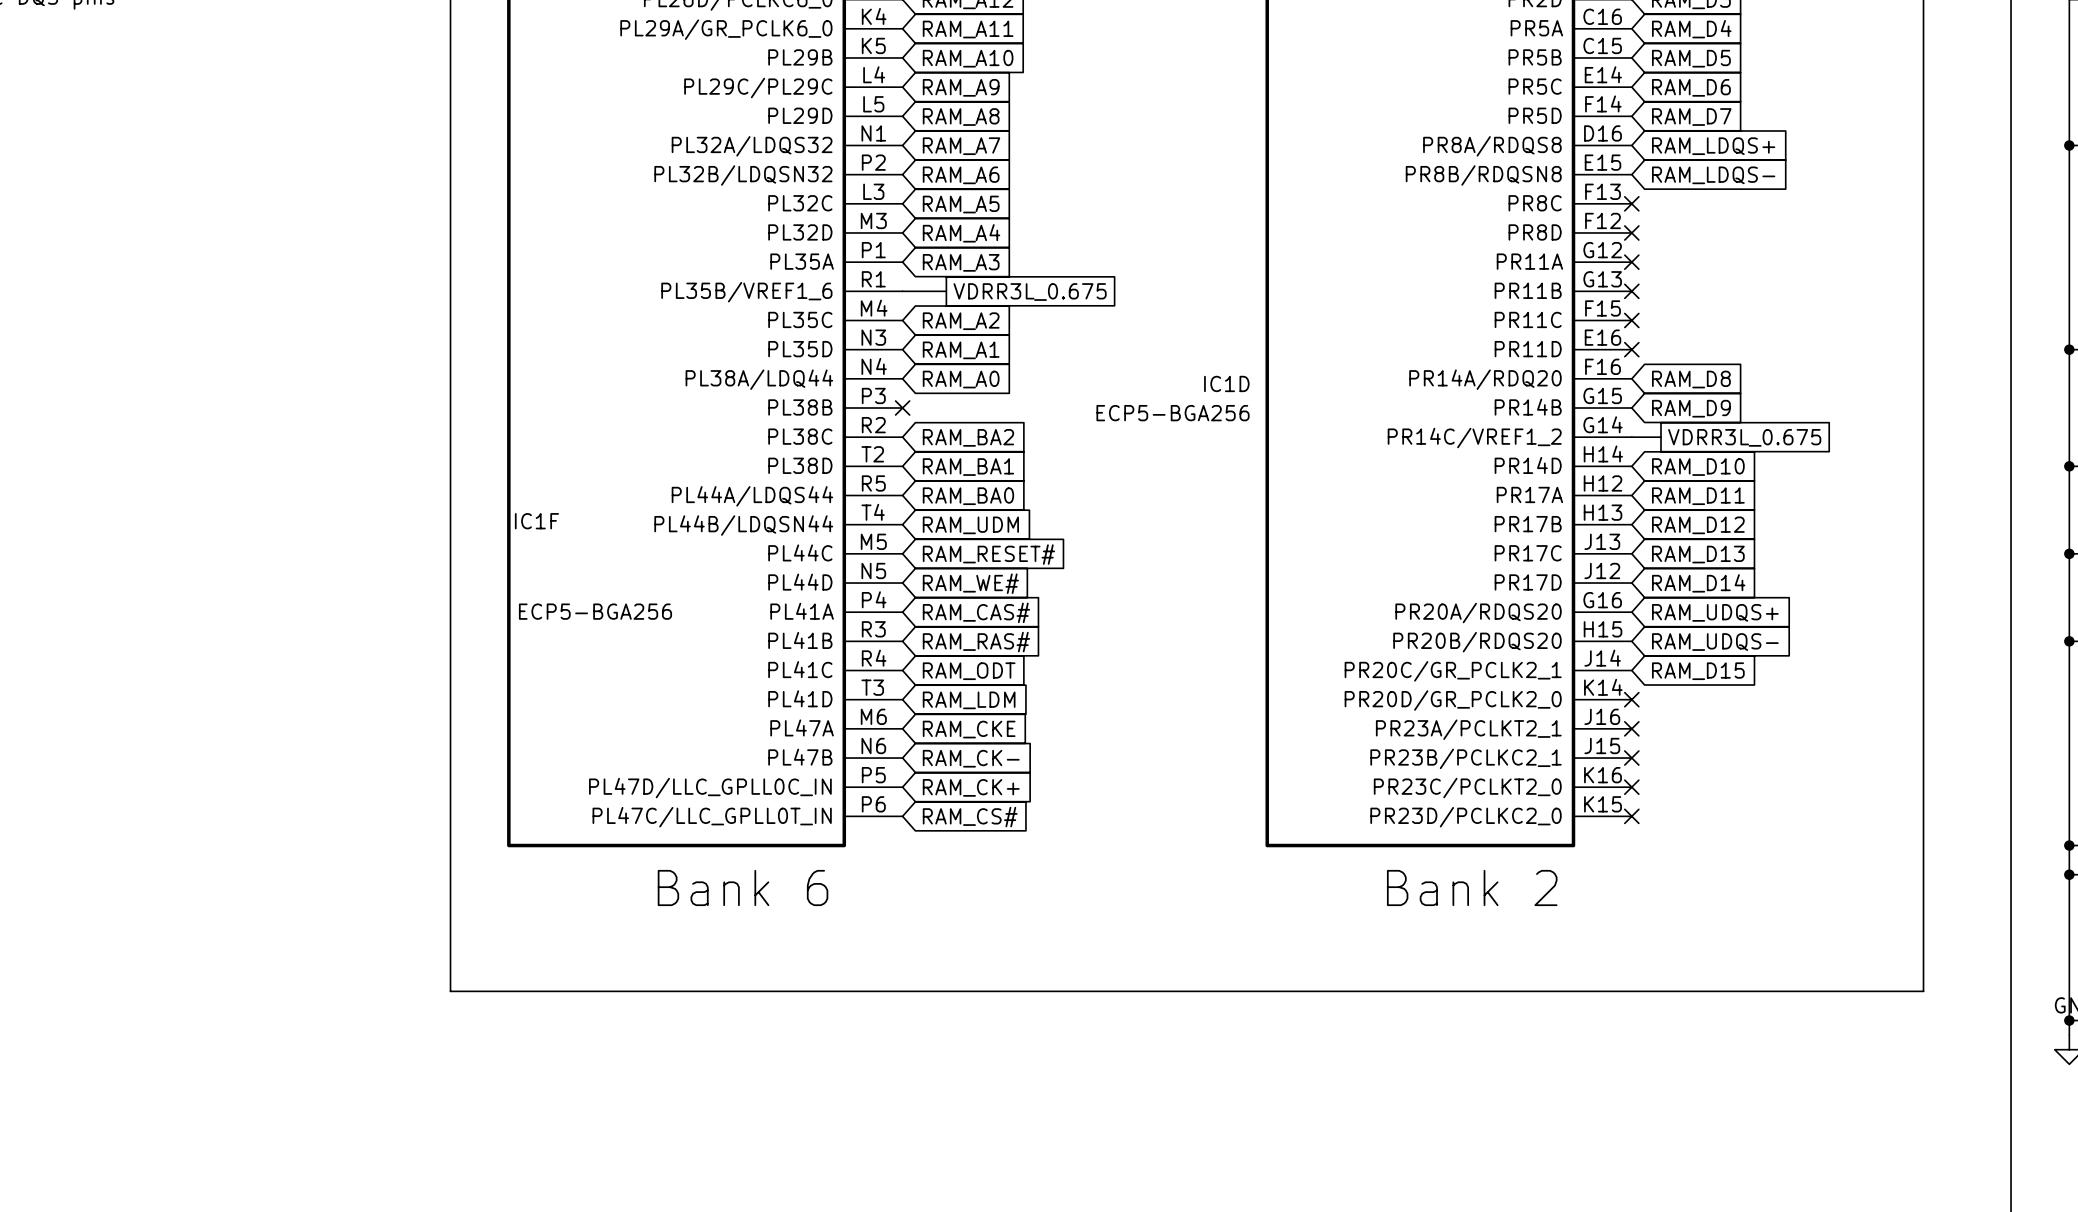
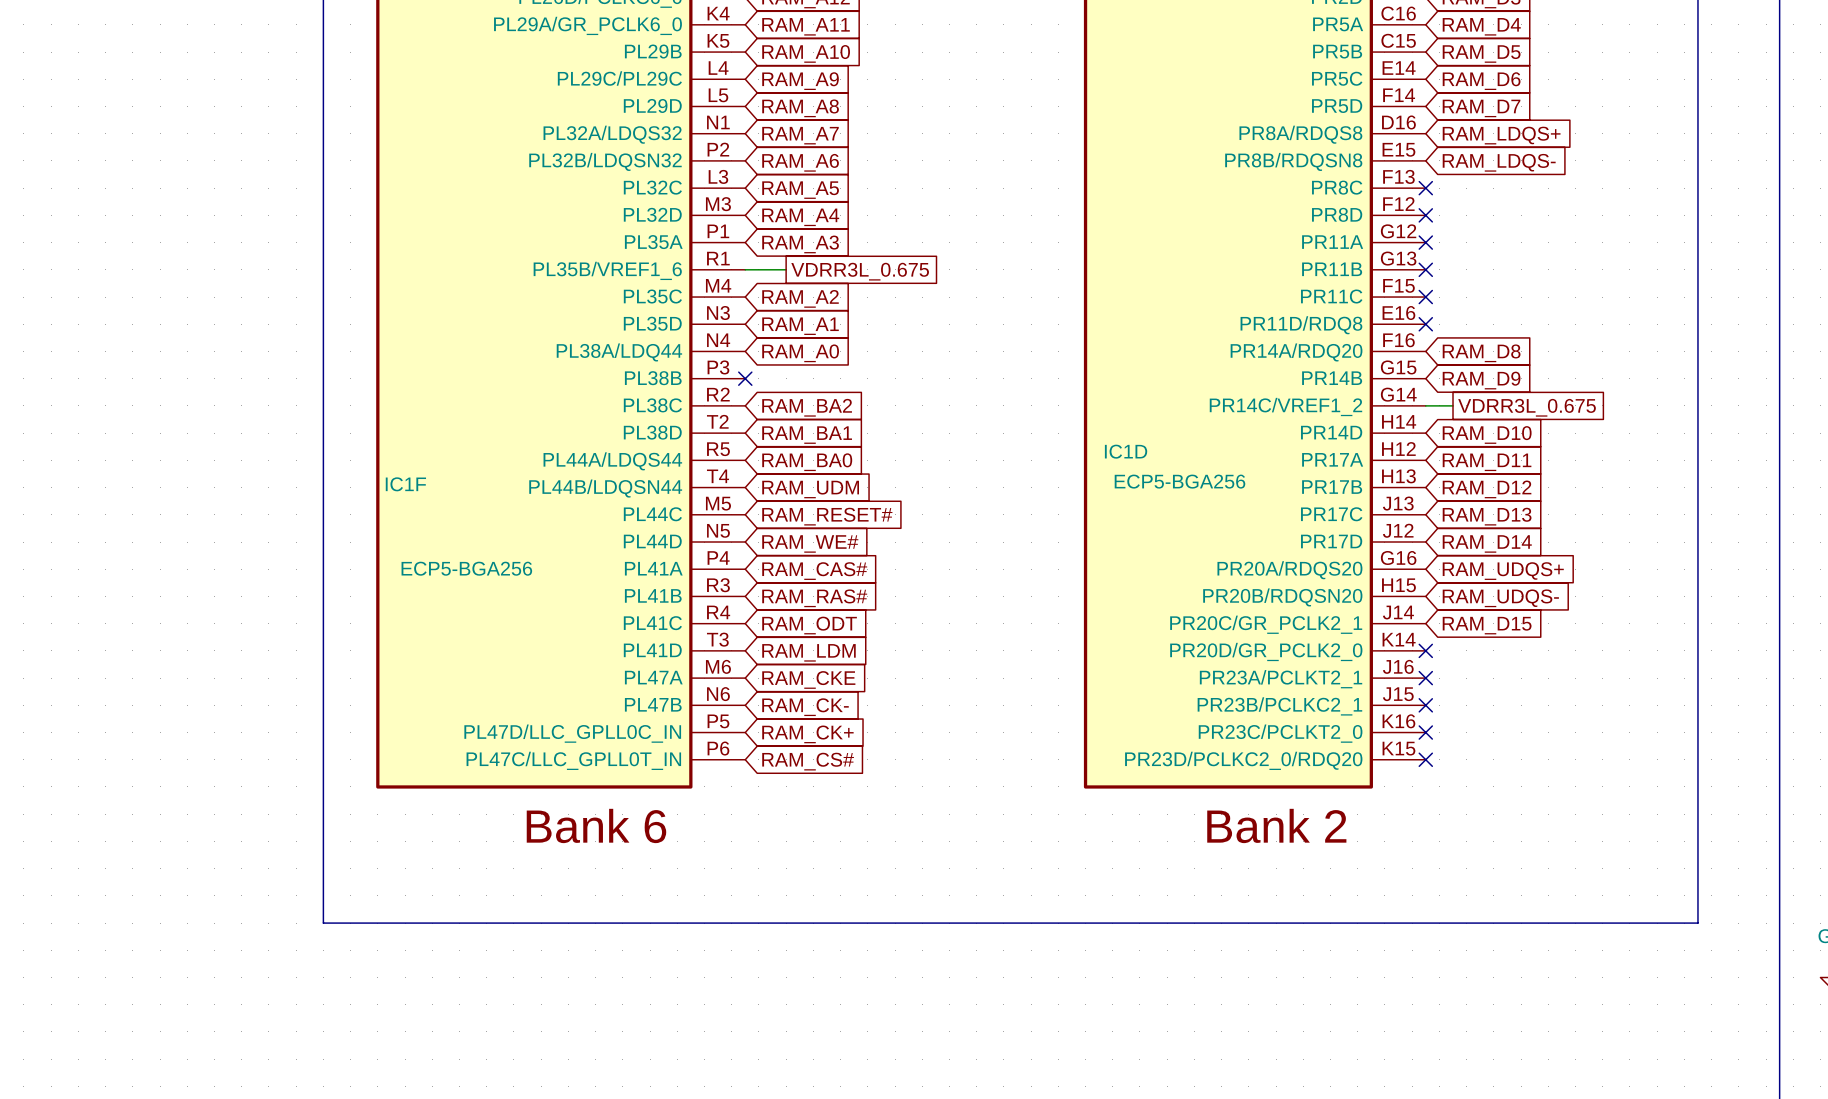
IC1D pin name: PR11D (1528, 349) -> PR11D/RDQ8 (1301, 325)
IC1D name position: IC1D (1226, 383) -> IC1D (1126, 451)
IC1D value position: ECP5-BGA256 (1173, 413) -> ECP5-BGA256 (1179, 481)
IC1D pin name: PR20B/RDQS20 (1477, 642) -> PR20B/RDQSN20 (1282, 597)
IC1D pin name: PR23D/PCLKC2_0 (1466, 817) -> PR23D/PCLKC2_0/RDQ20 (1243, 760)

